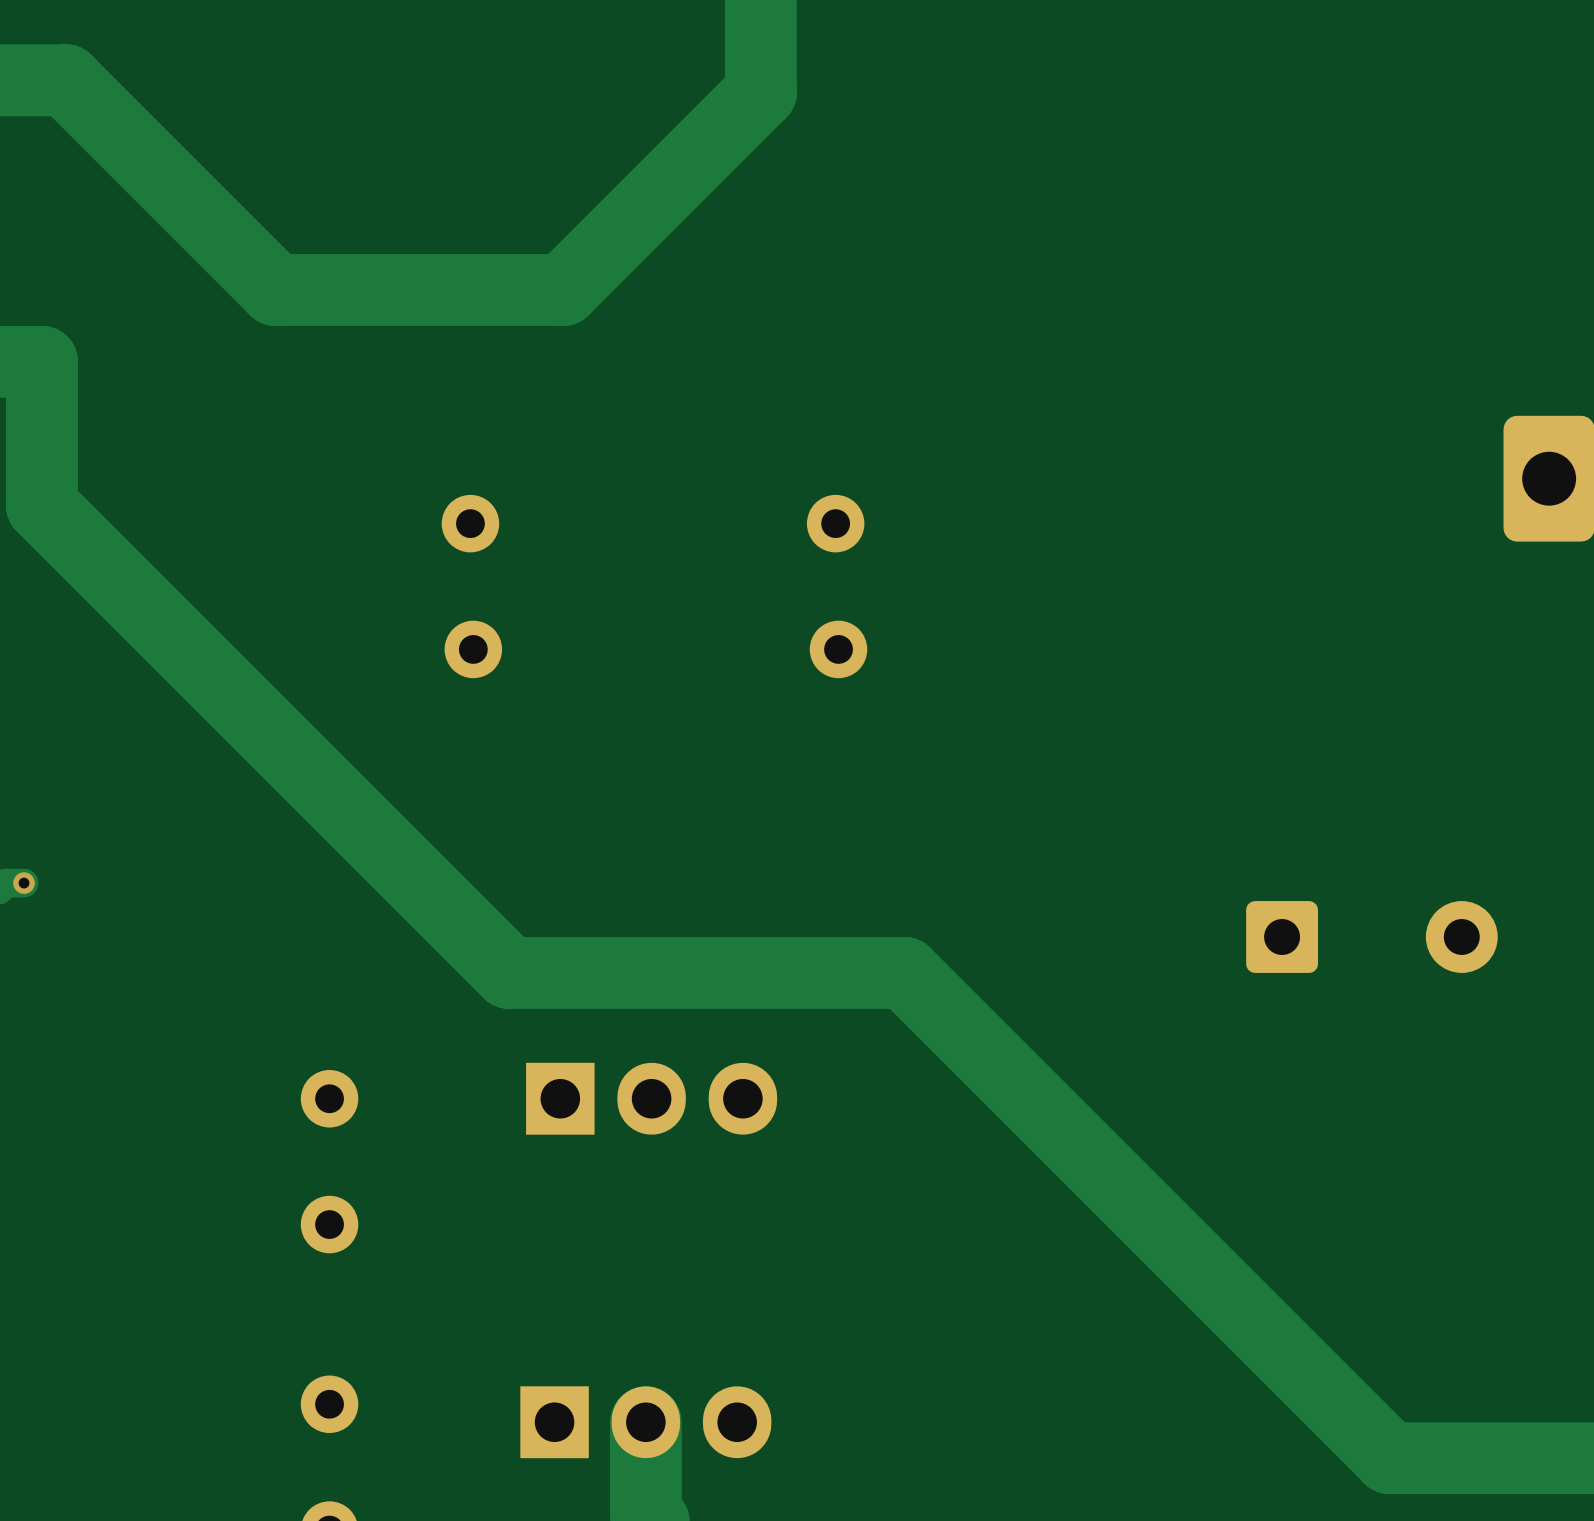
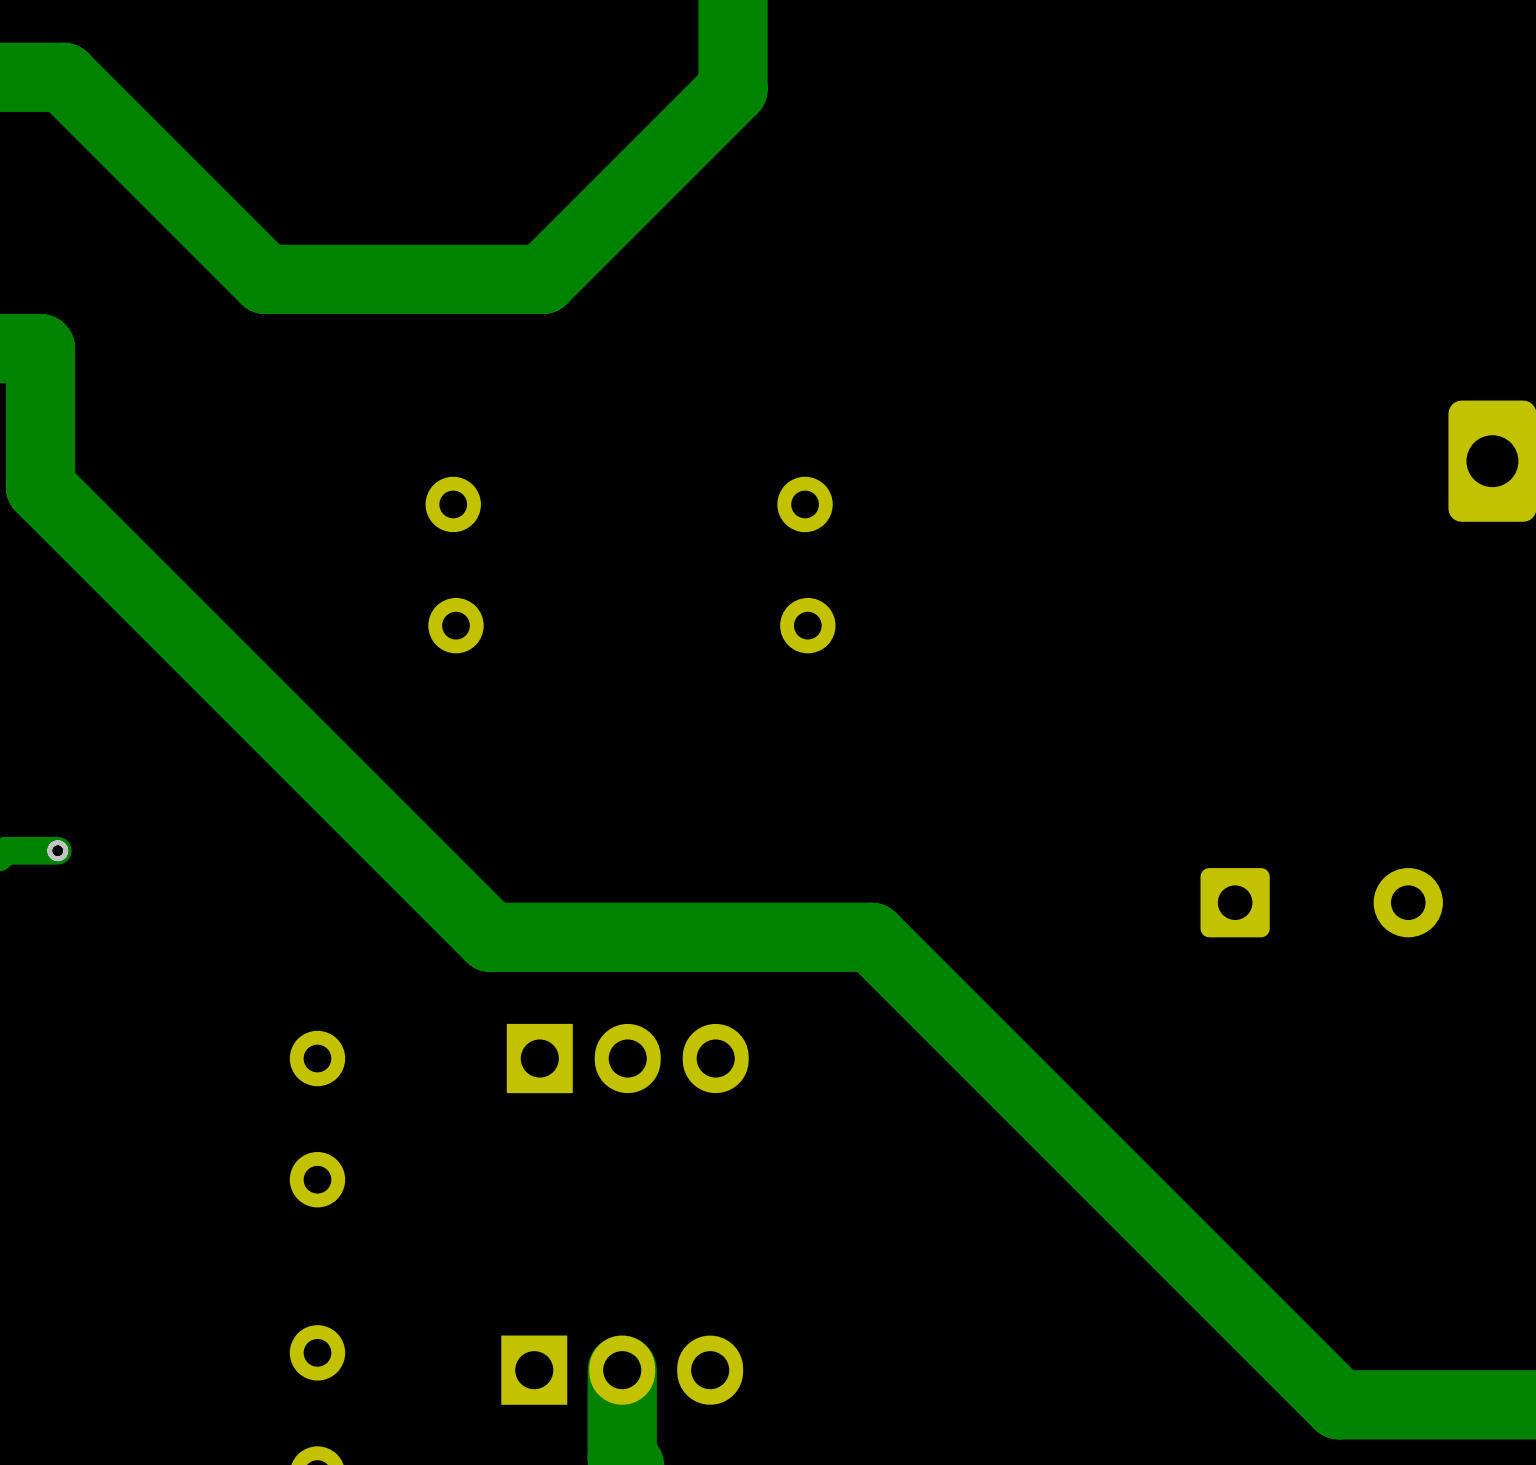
via position: (24, 883) -> (57, 850)
track: none -> (57, 850) (23, 850)

